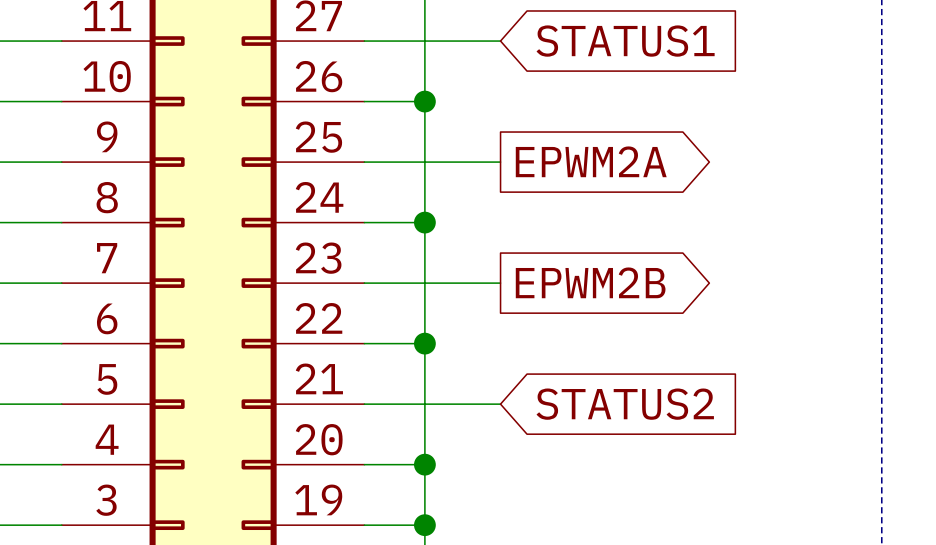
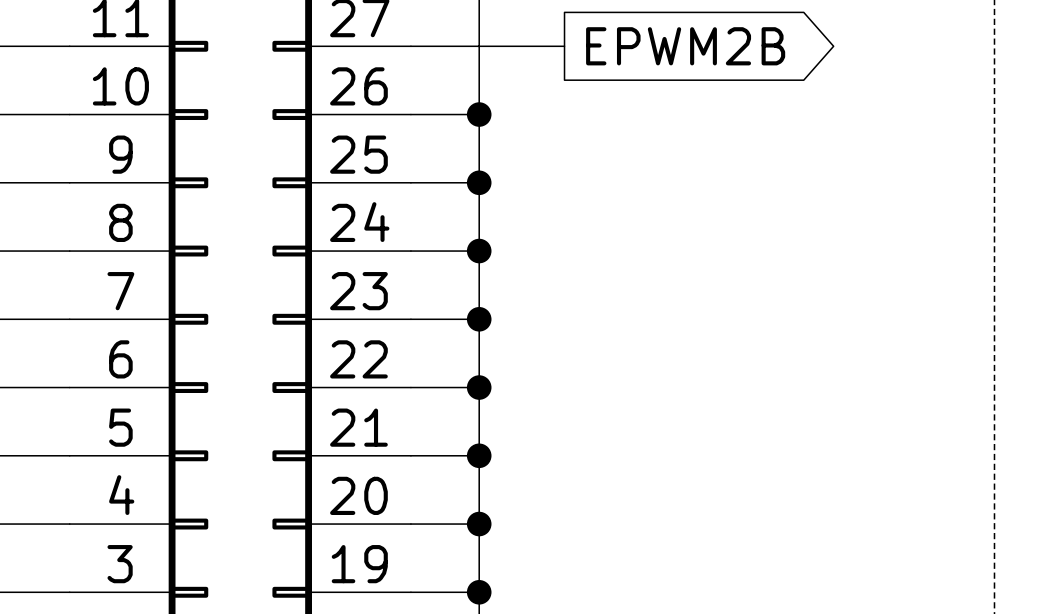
global label shape: input (625, 41) -> output (685, 46)
global label: STATUS1 (625, 41) -> EPWM2B (685, 46)
global label: EPWM2A (591, 161) -> none
wire: (424, 162) (500, 162) -> none
junction: none -> (479, 182)
global label: EPWM2B (590, 282) -> none
wire: (424, 283) (500, 283) -> none
junction: none -> (479, 319)
wire: (424, 404) (500, 404) -> none
junction: none -> (479, 455)
global label: STATUS2 (625, 404) -> none

